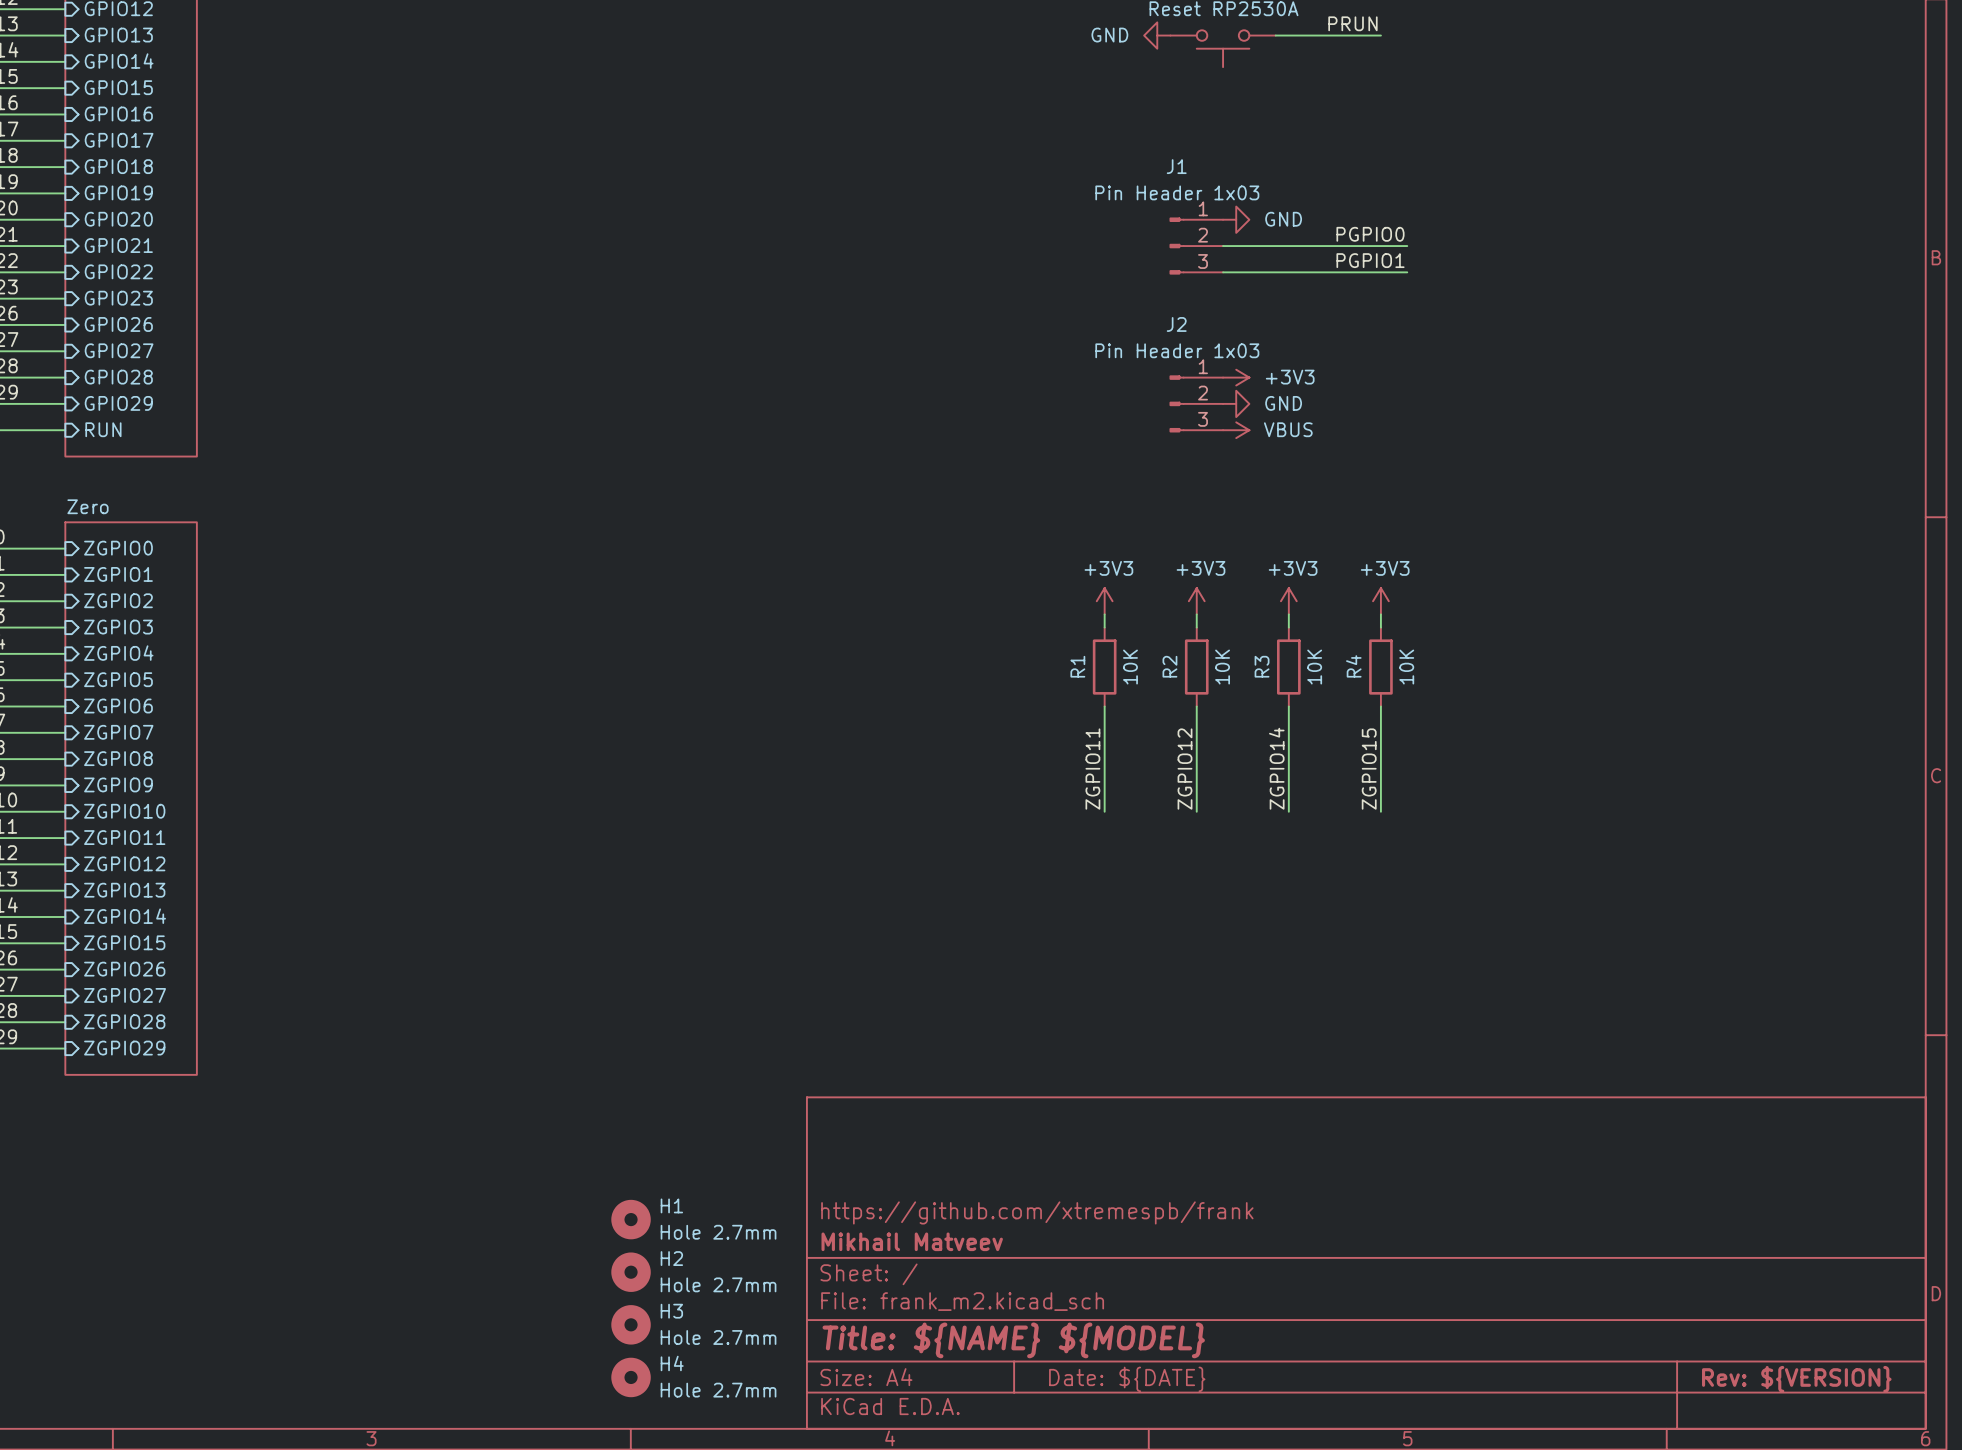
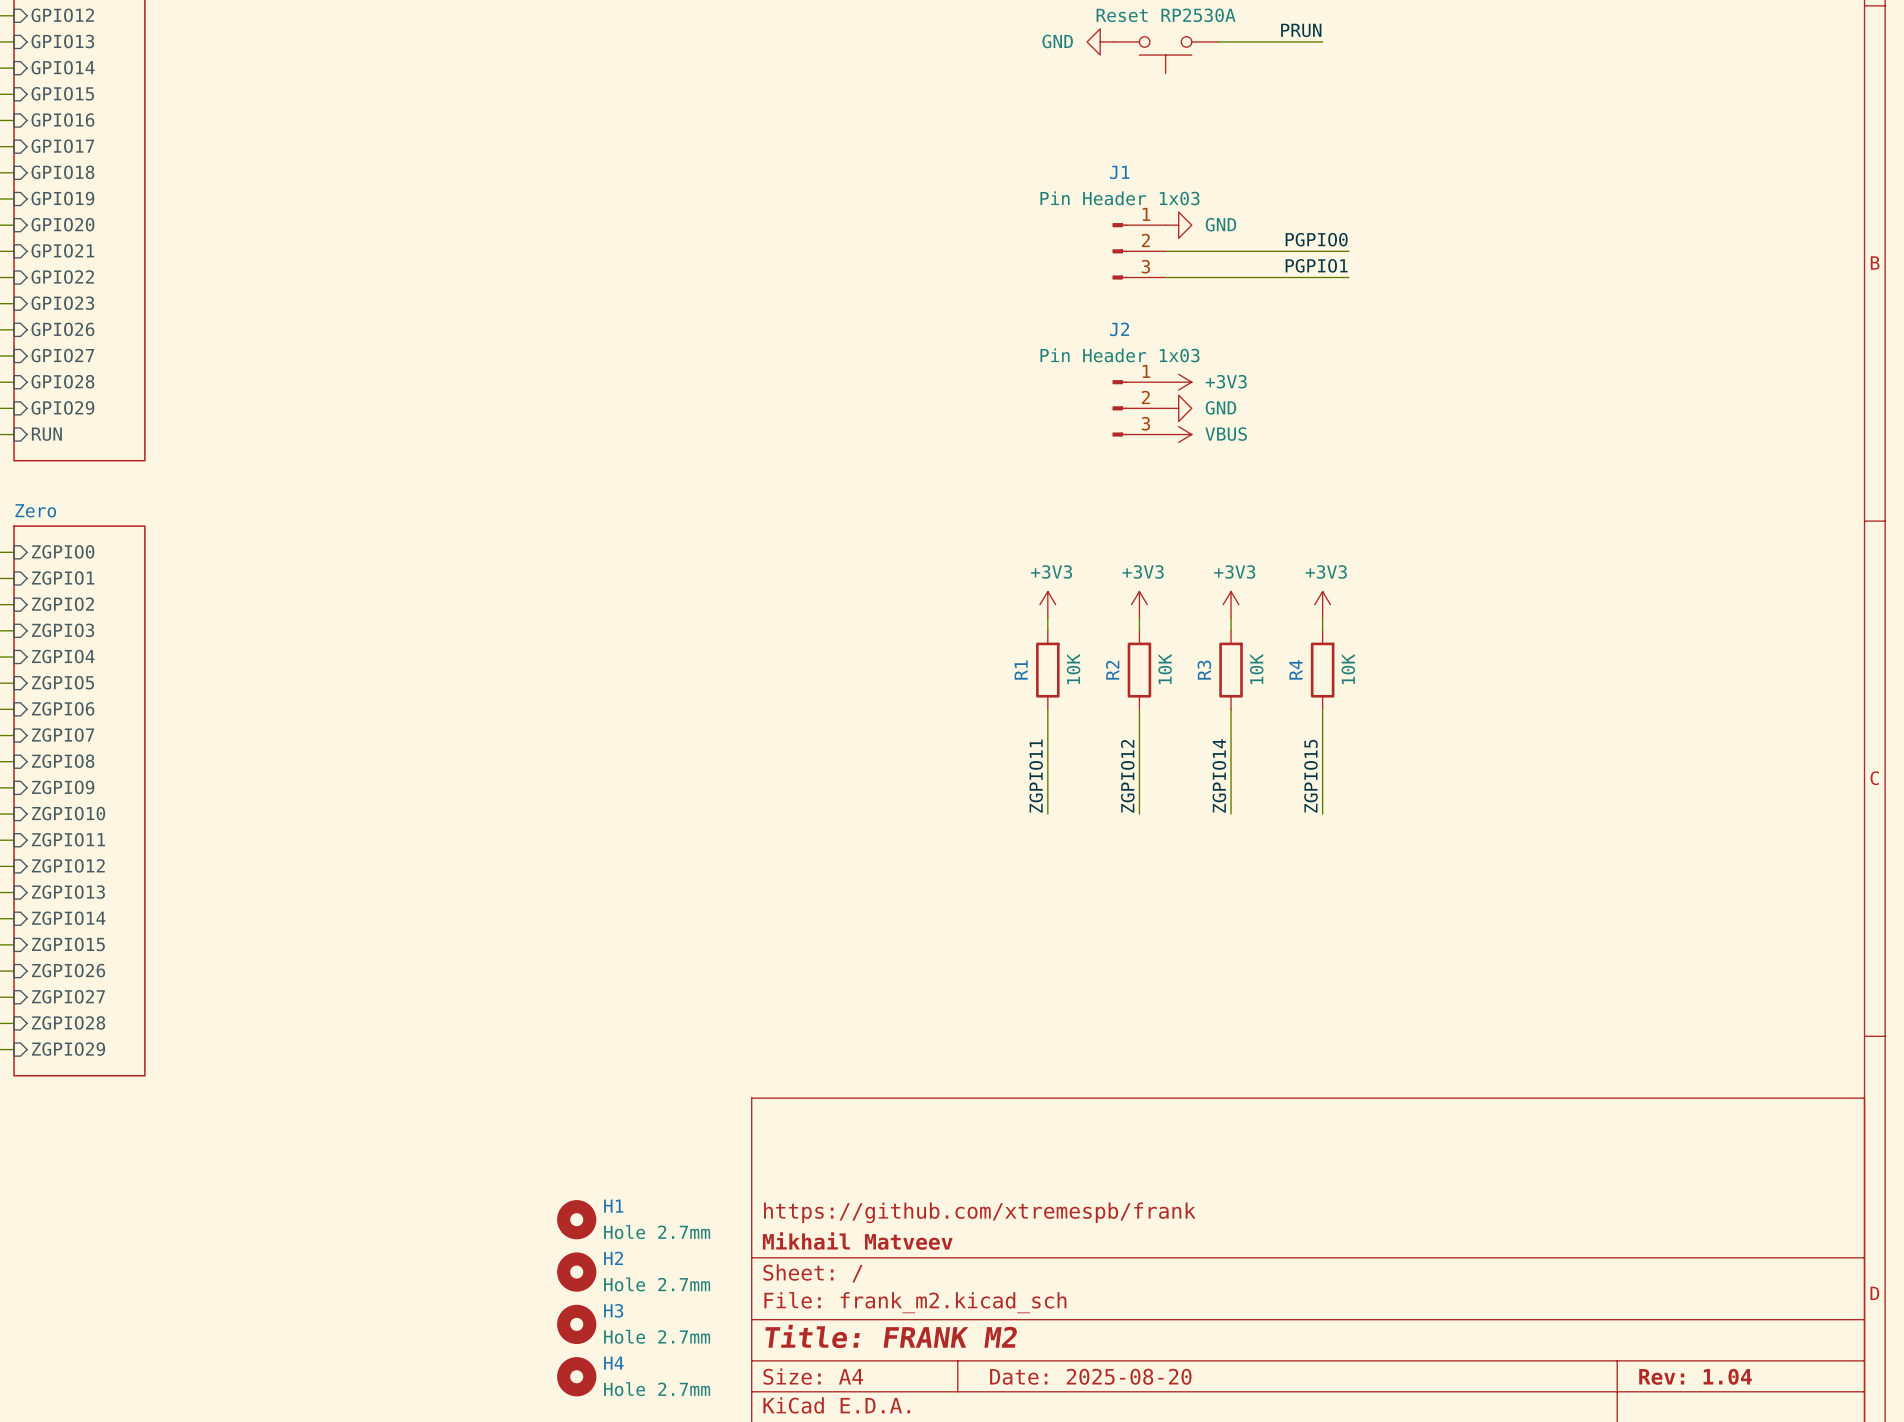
title block: Title: ${NAME} ${MODEL} (1013, 1340) -> Title: FRANK M2 (891, 1336)
title block: Date: ${DATE} (1127, 1379) -> Date: 2025-08-20 (1090, 1376)
title block: Rev: ${VERSION} (1796, 1379) -> Rev: 1.04 (1695, 1376)

